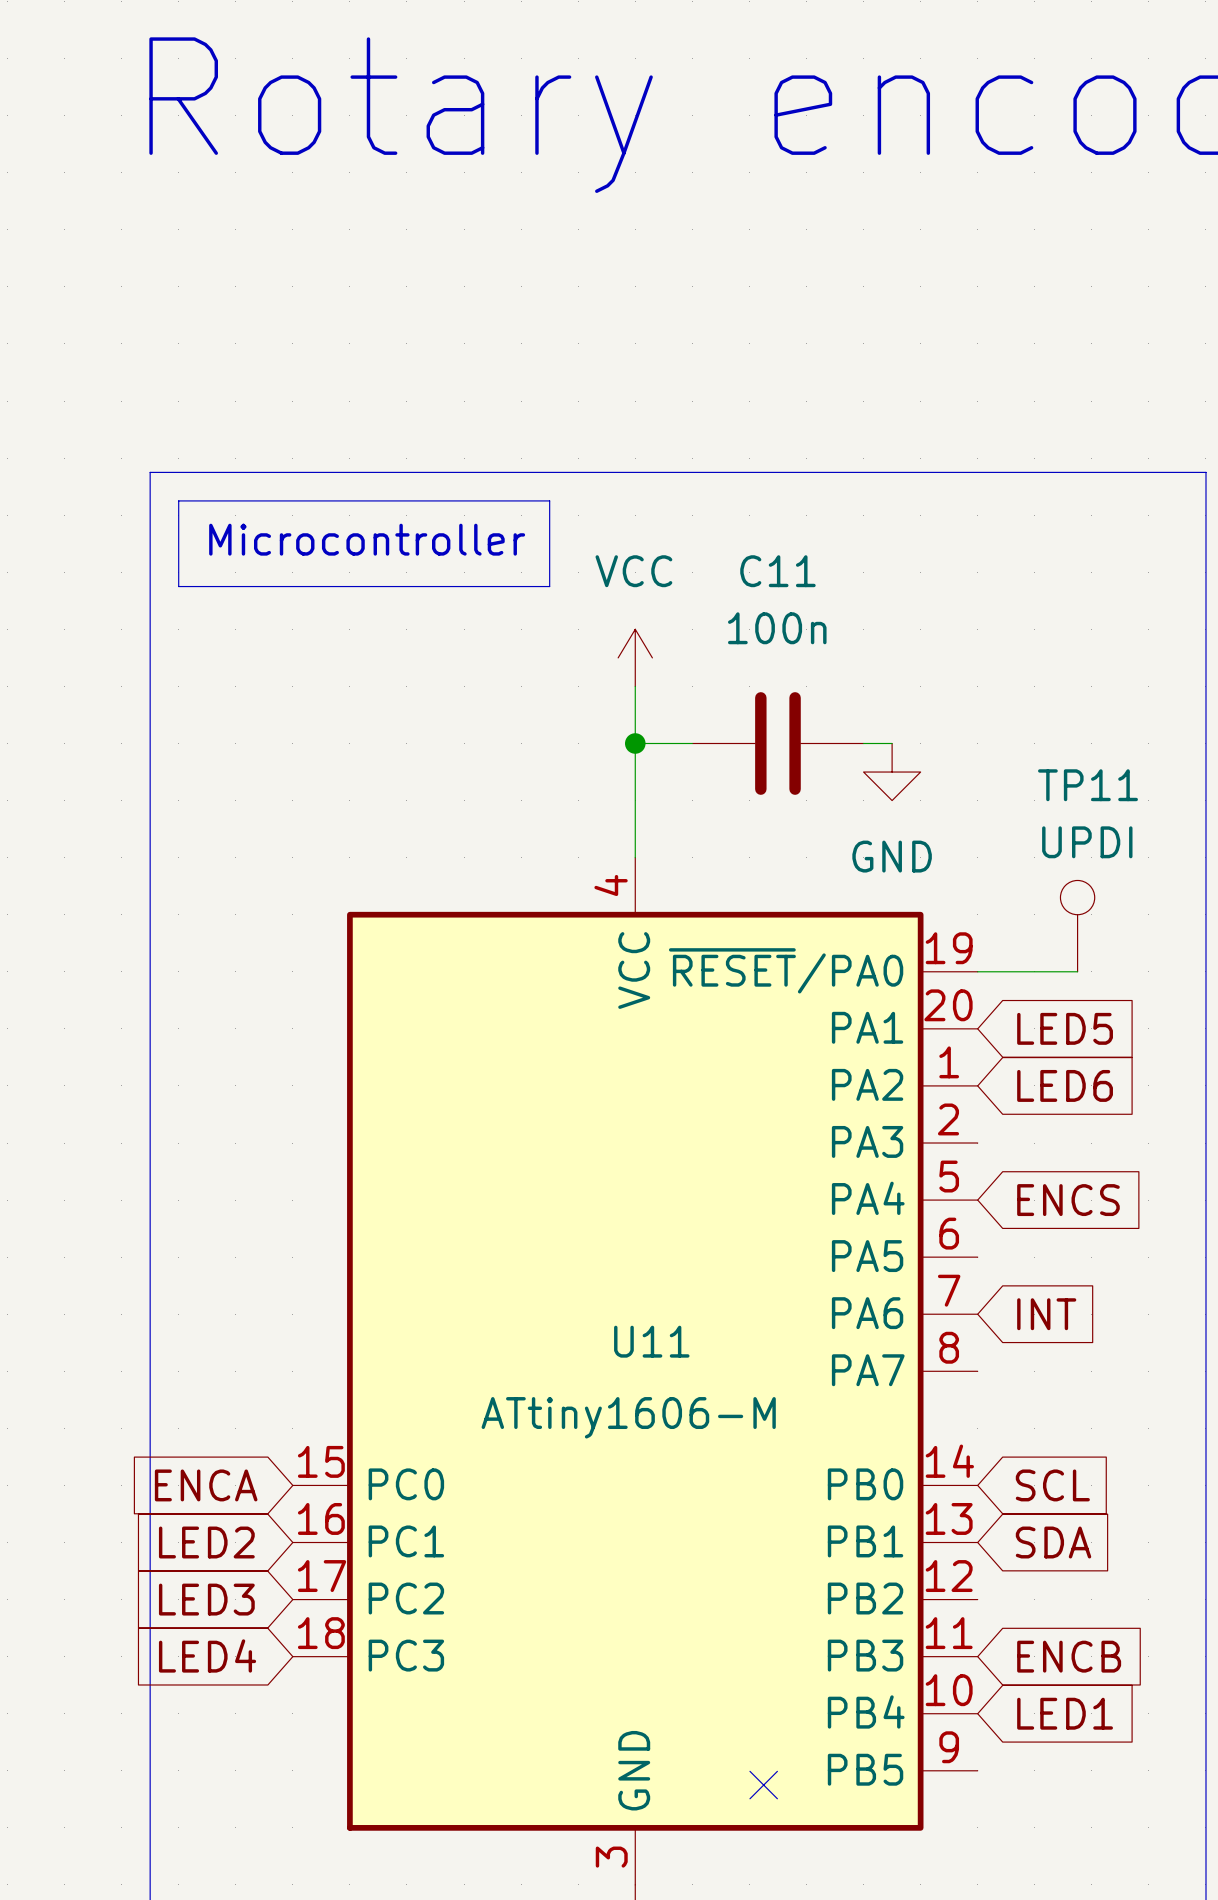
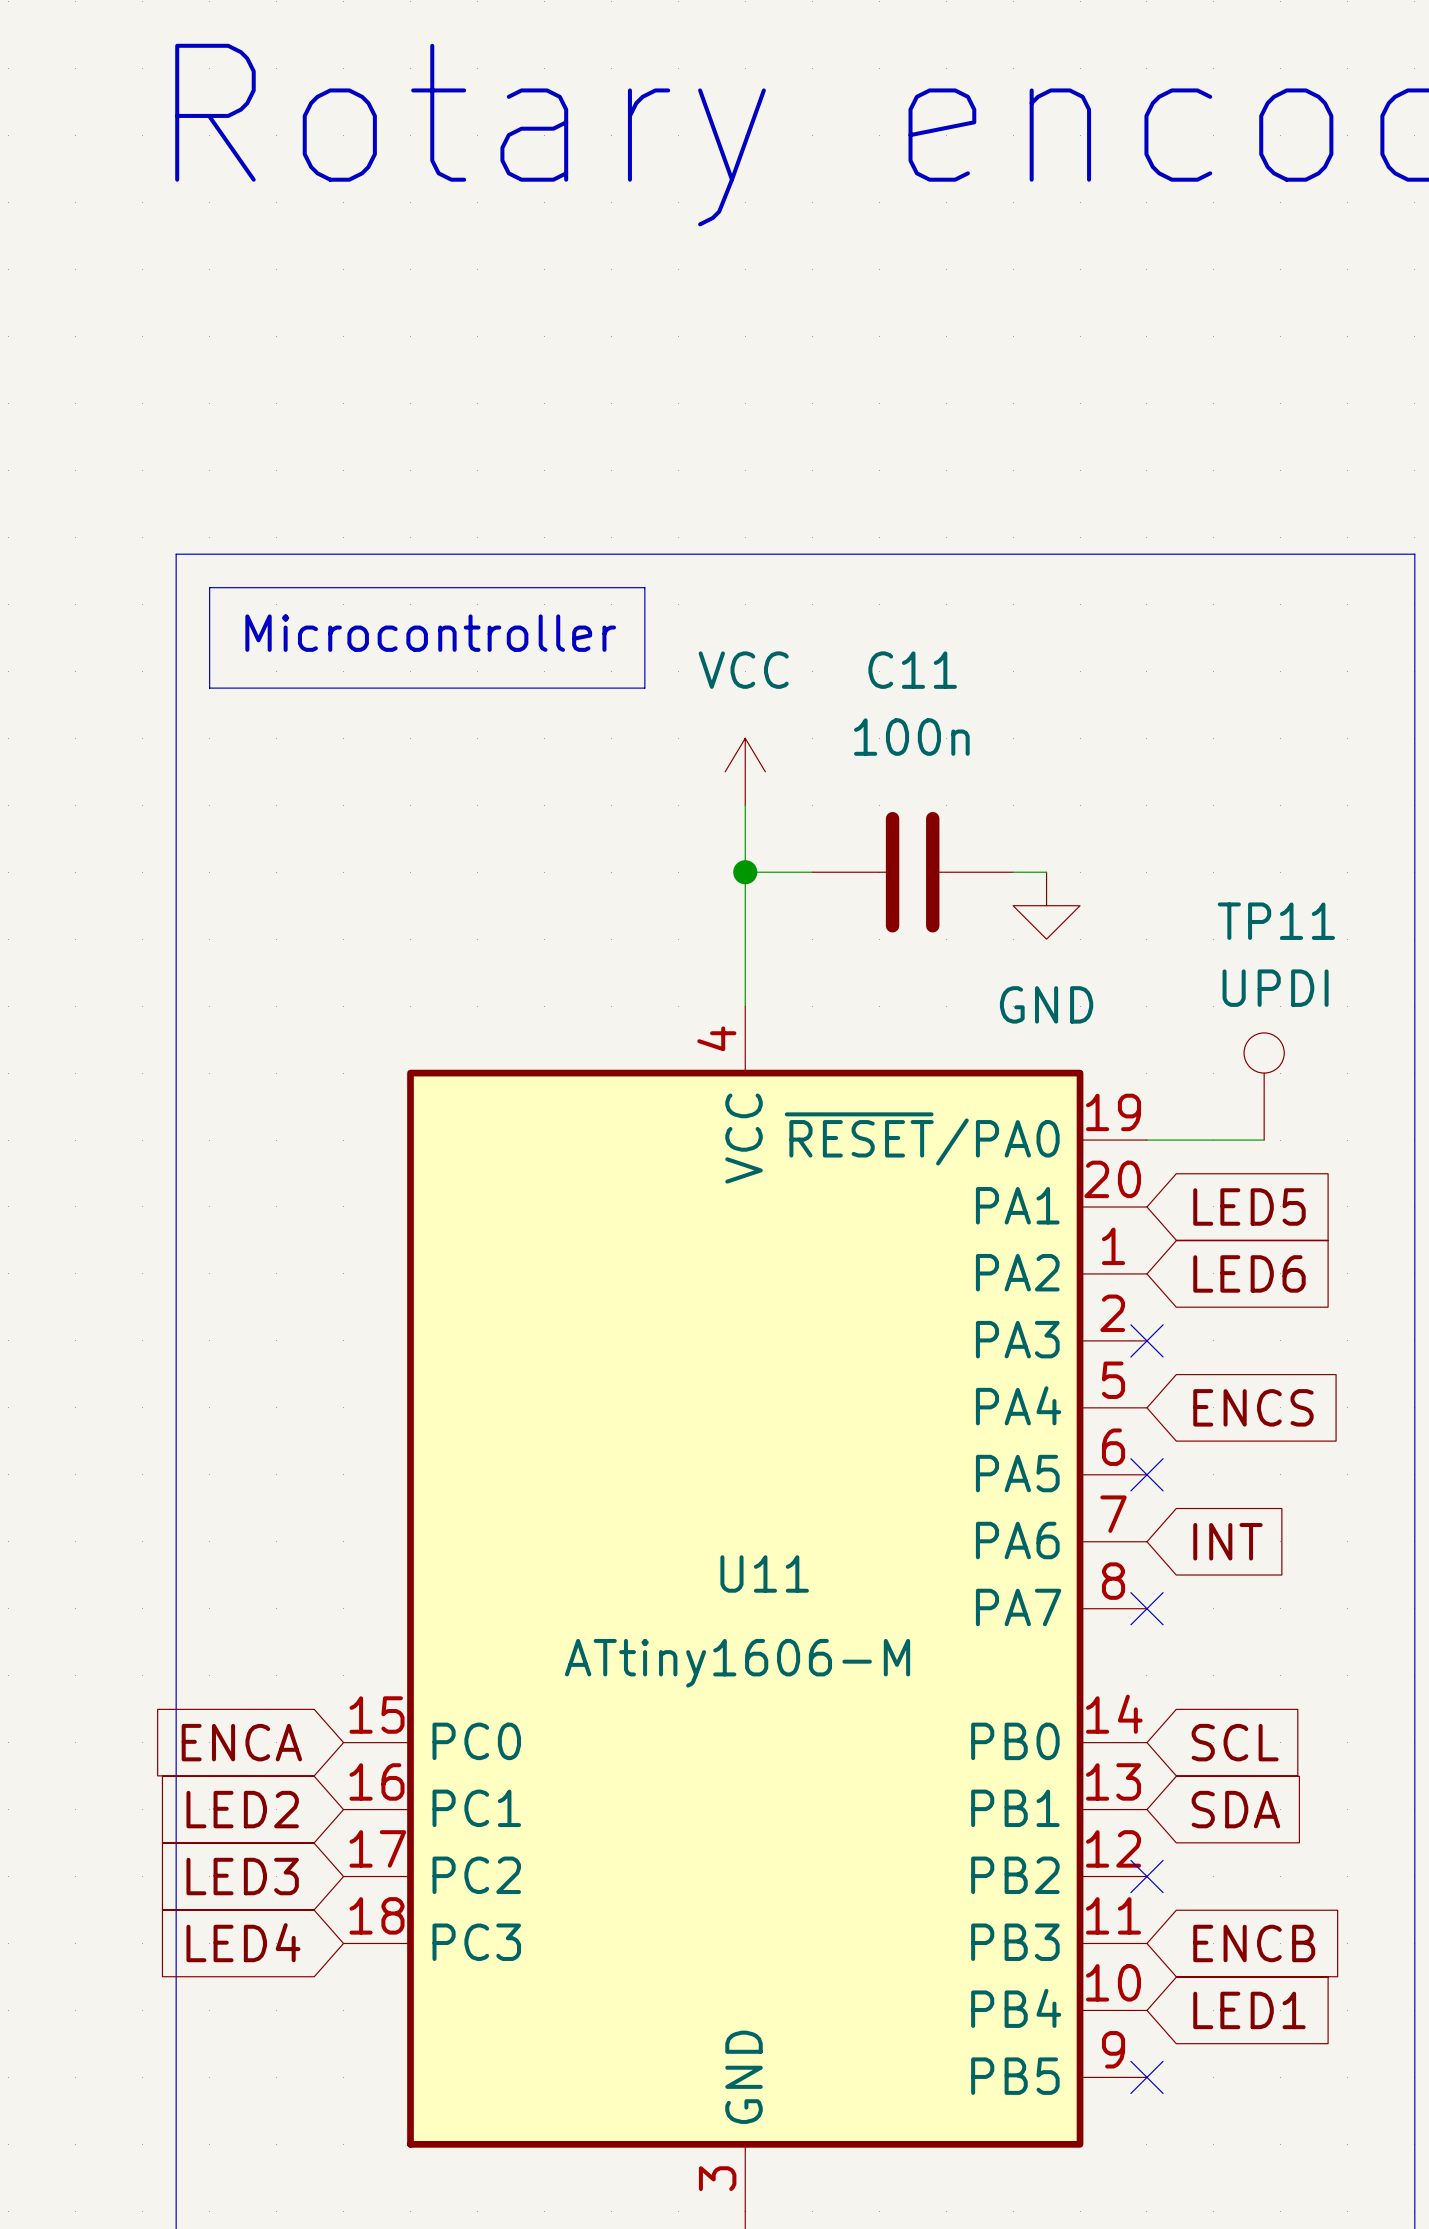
no-connect mark: none -> (1146, 1340)
no-connect mark: none -> (1146, 1474)
no-connect mark: none -> (1146, 1608)
no-connect mark: none -> (1146, 1876)
no-connect mark: none -> (1146, 2077)
no-connect mark: (763, 1785) -> none

